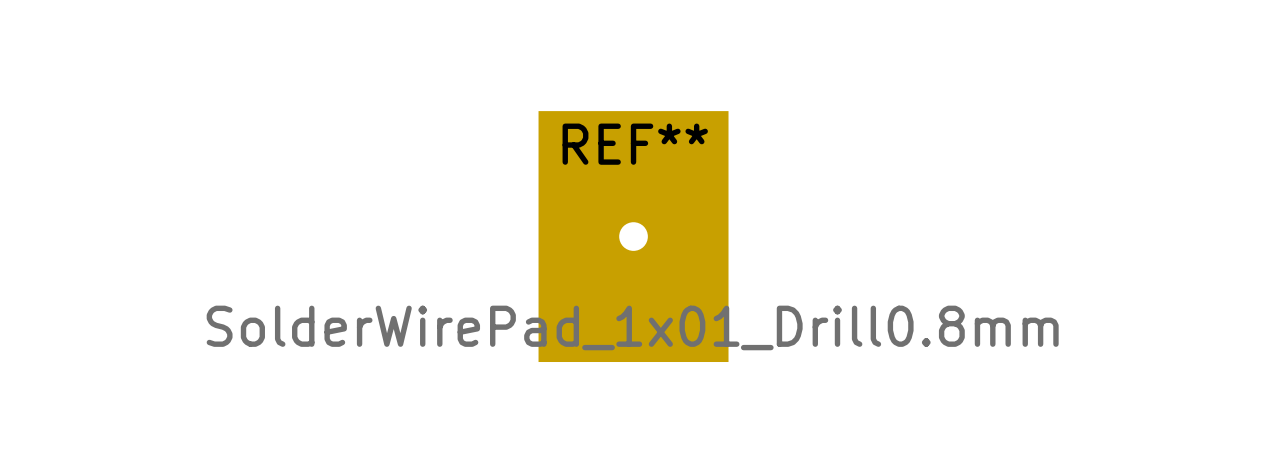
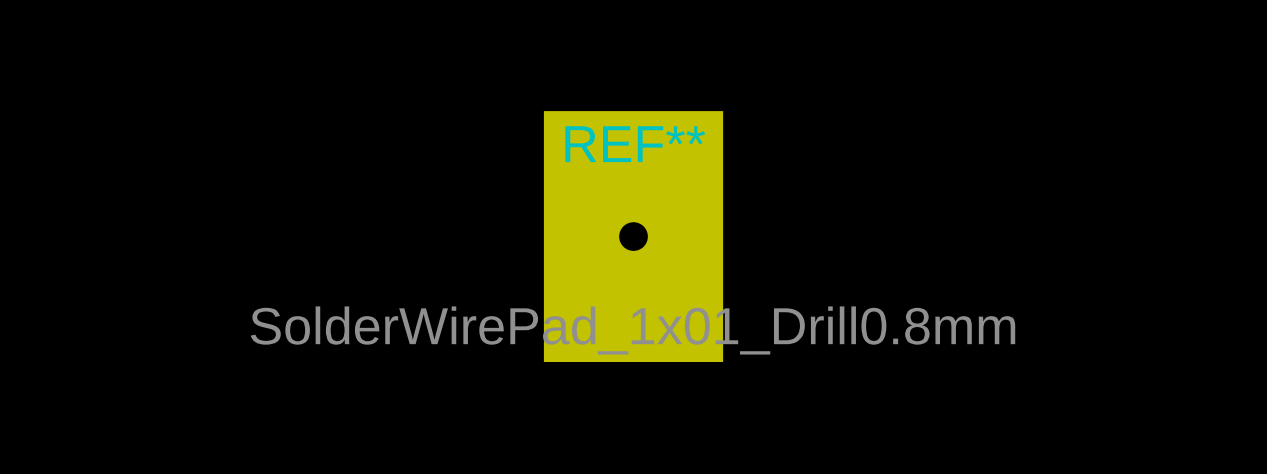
REF** footprint: [538, 111, 729, 363] -> [543, 111, 724, 363]

